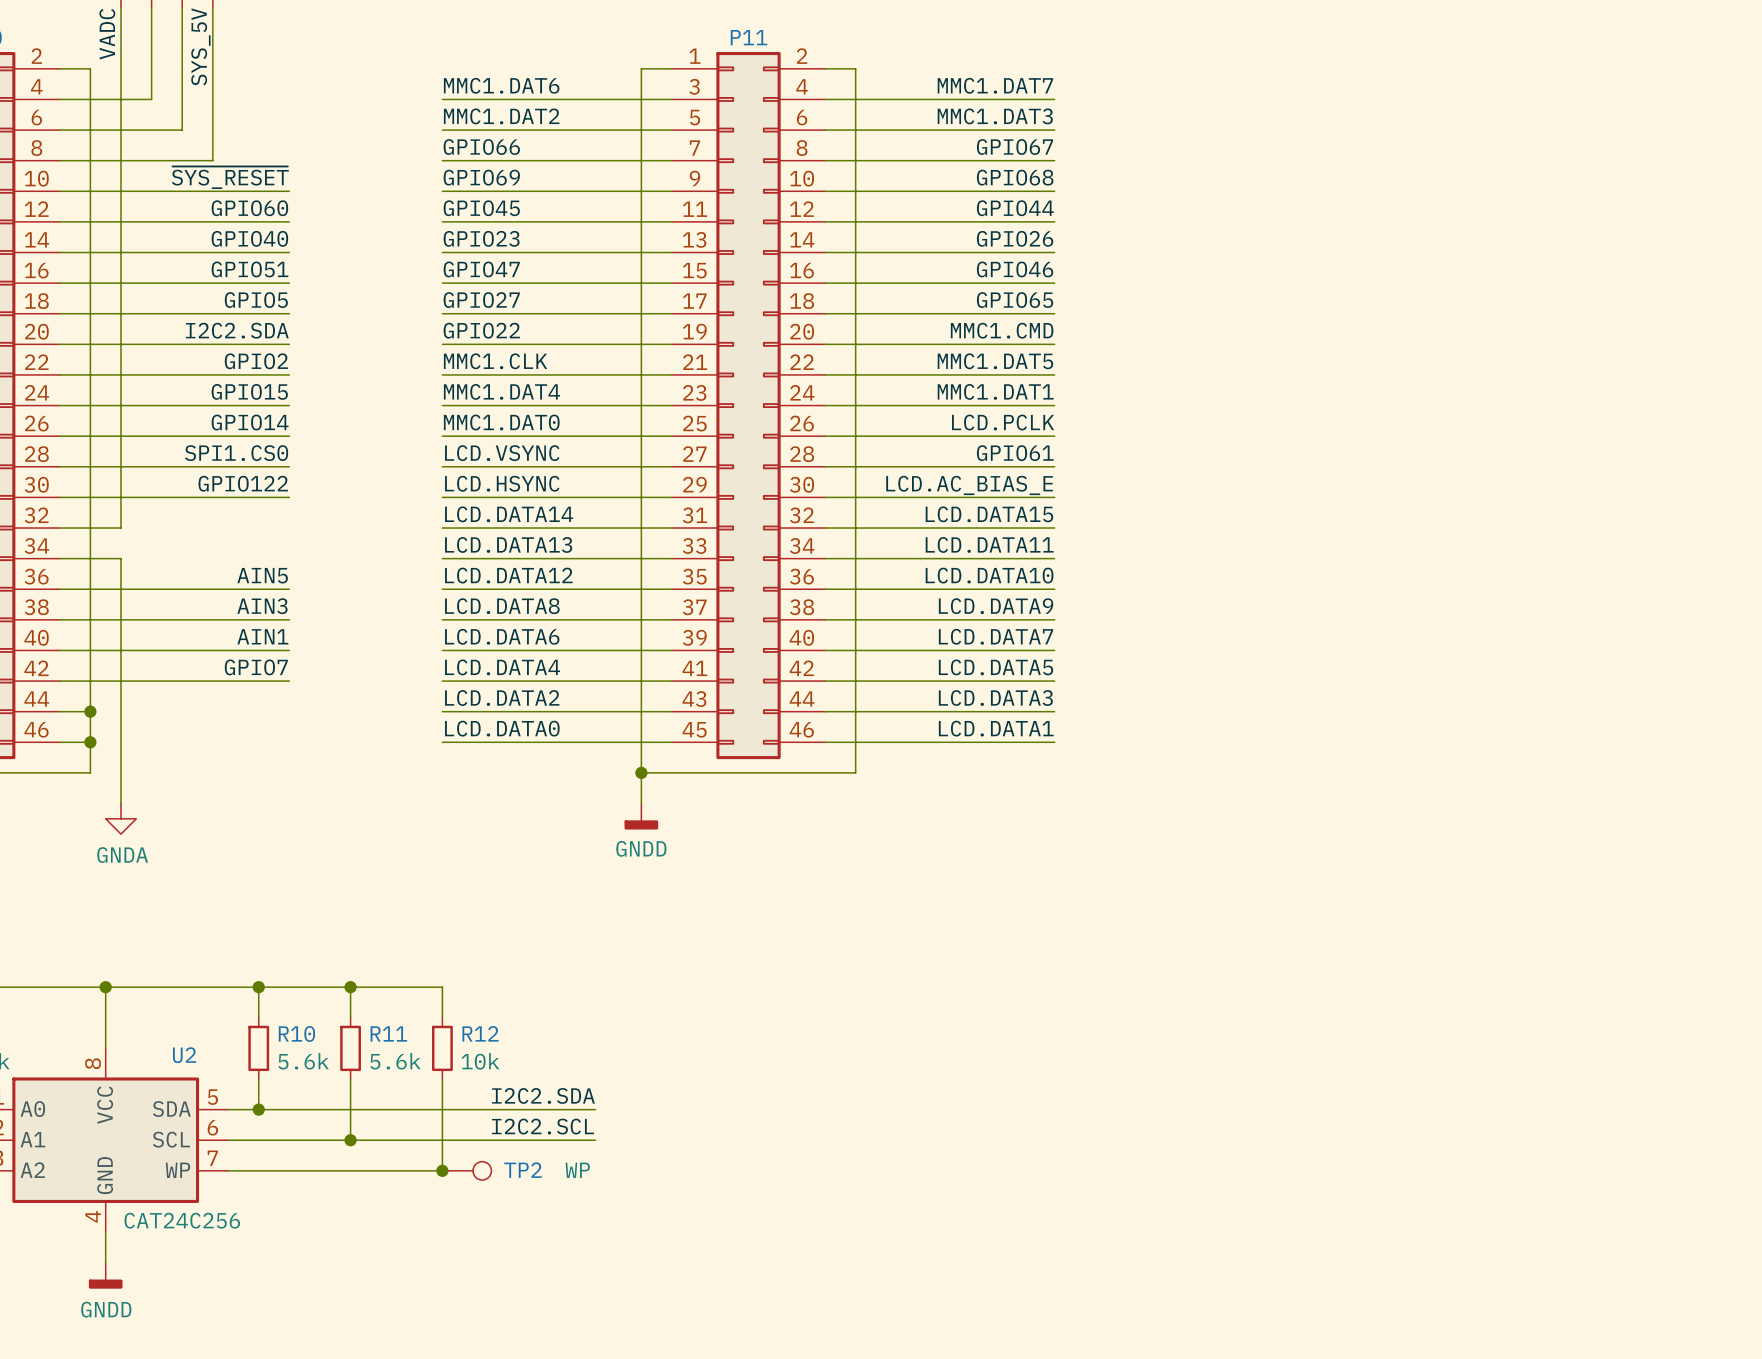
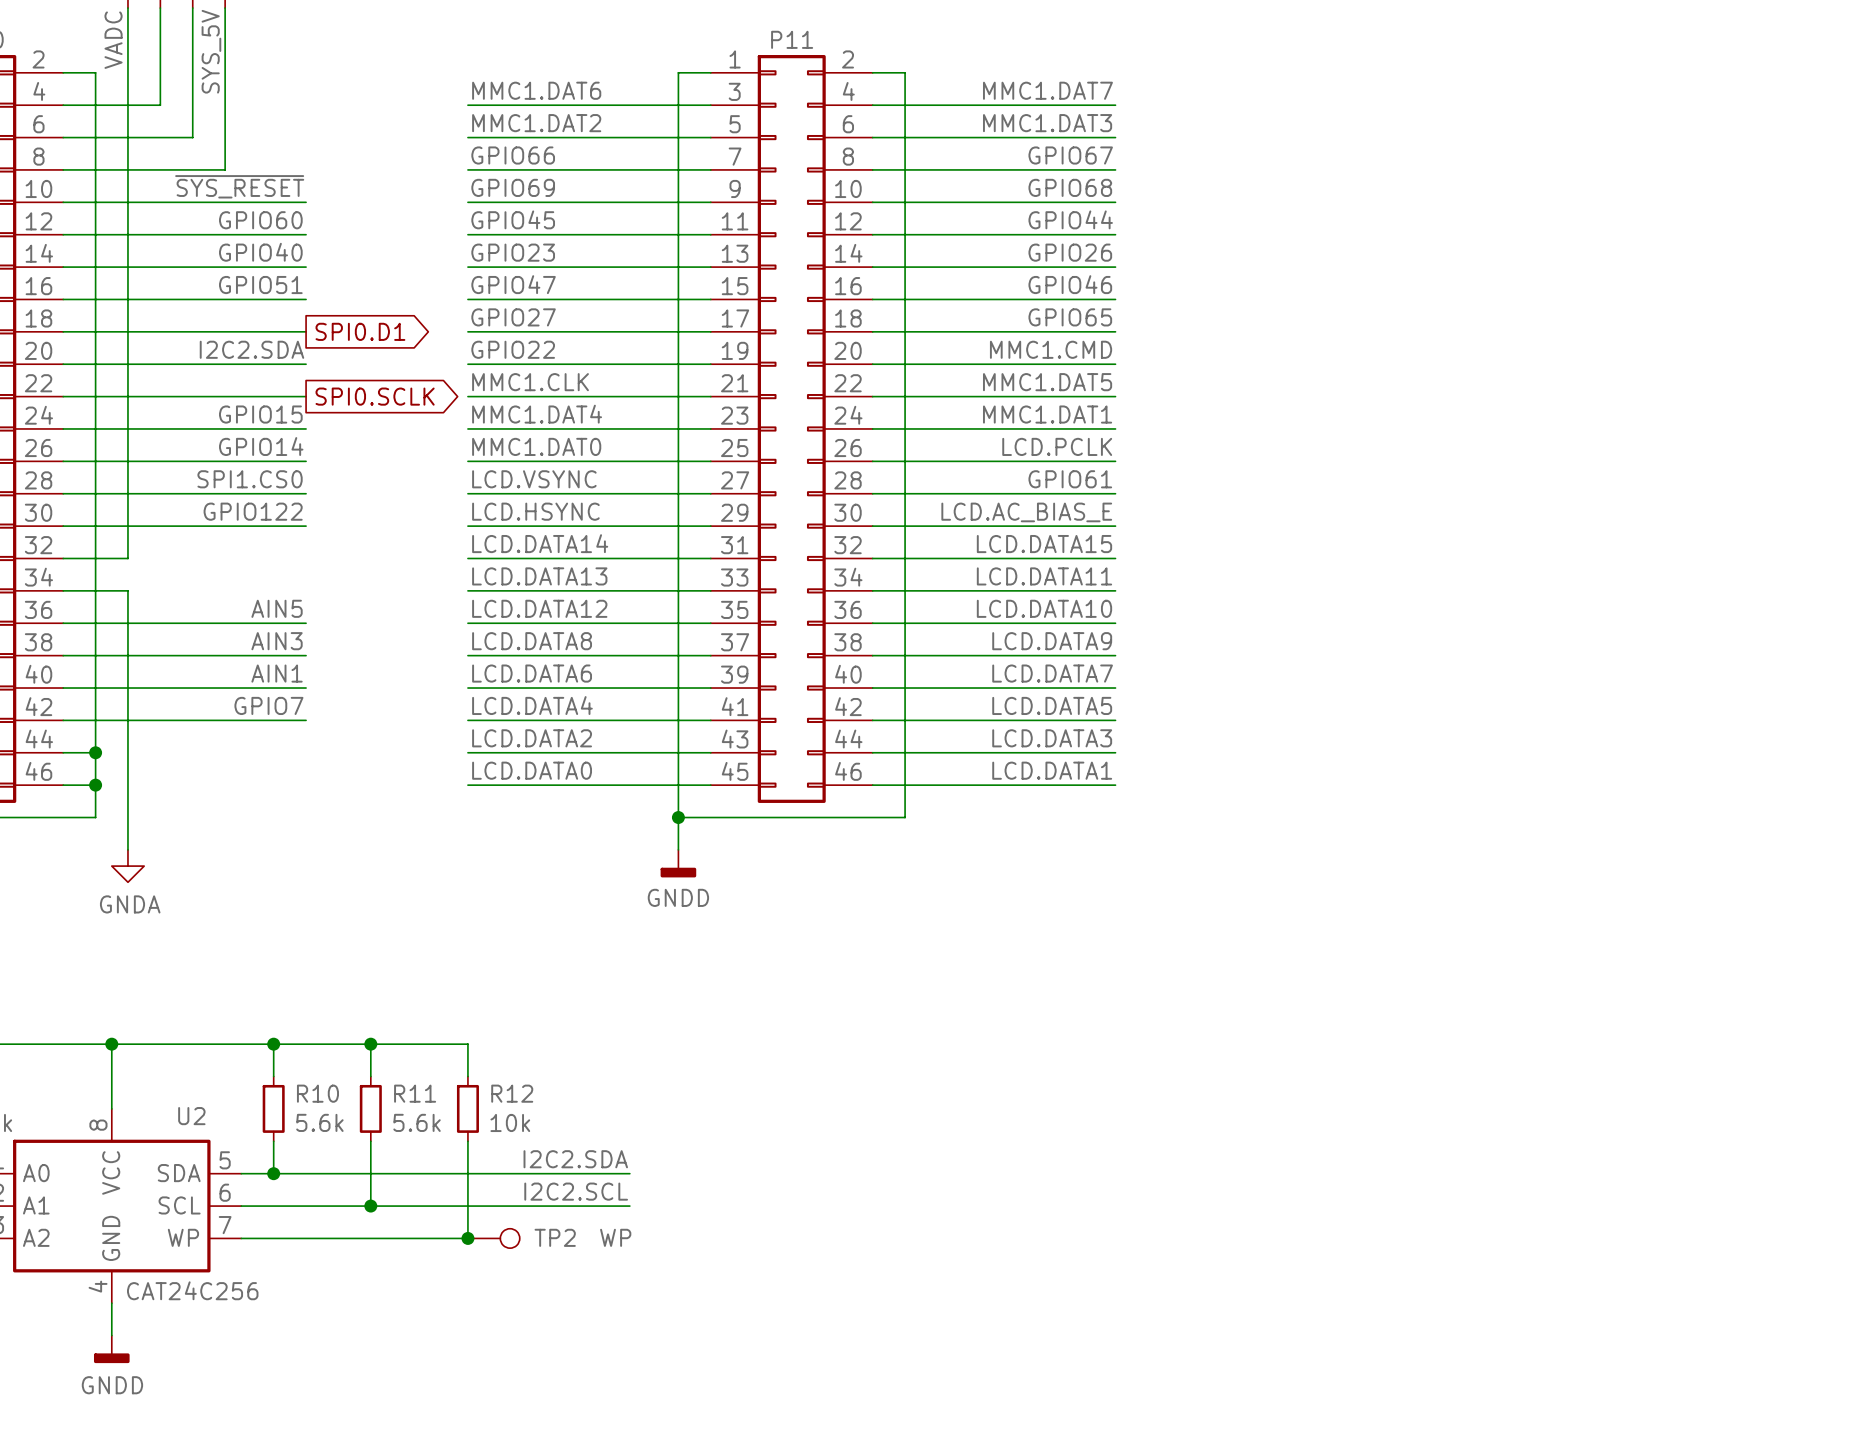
label: GPIO5 (256, 300) -> none
global label: none -> SPI0.D1 (360, 331)
label: GPIO2 (256, 361) -> none
global label: none -> SPI0.SCLK (375, 396)

